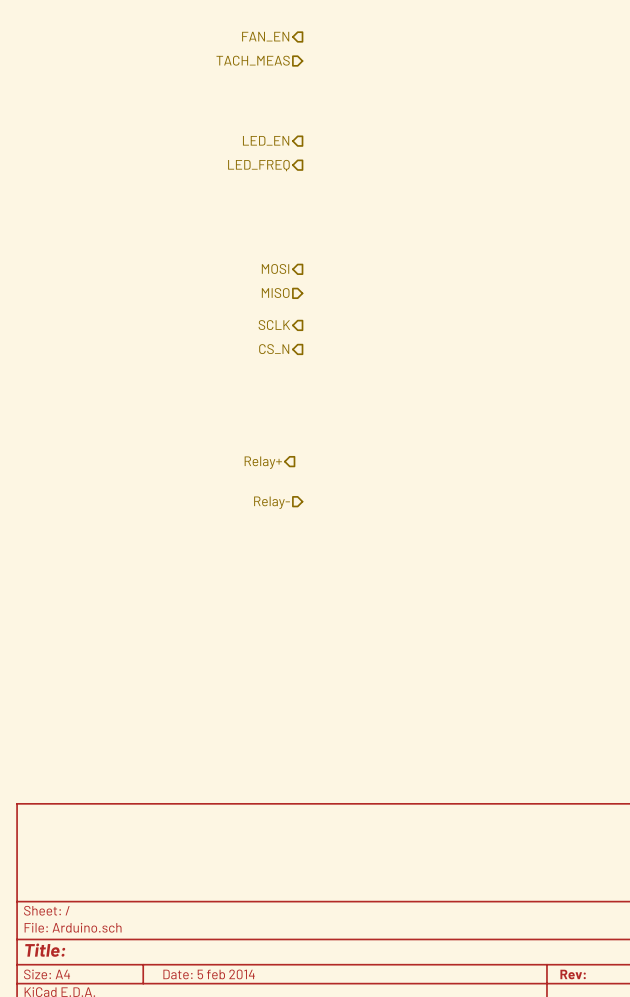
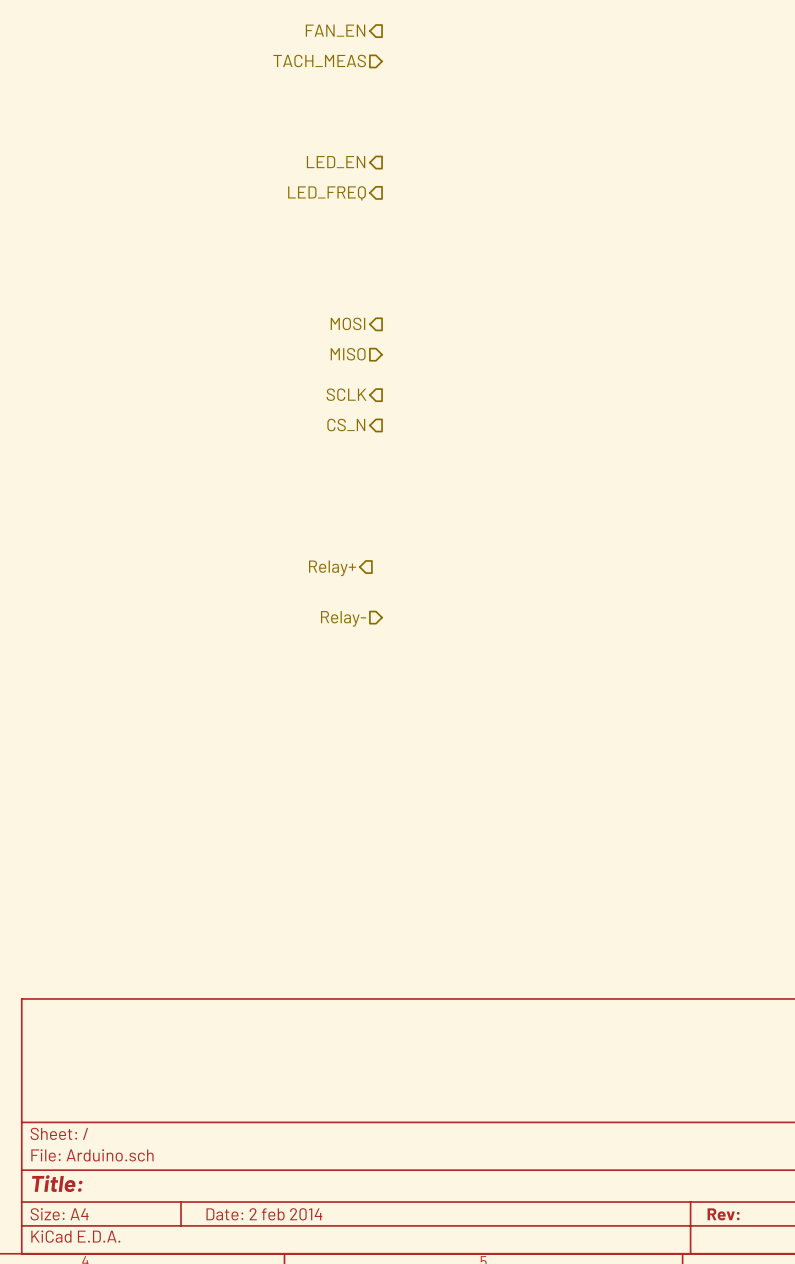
title block: Date: 5 feb 2014 (209, 974) -> Date: 2 feb 2014 (264, 1214)

